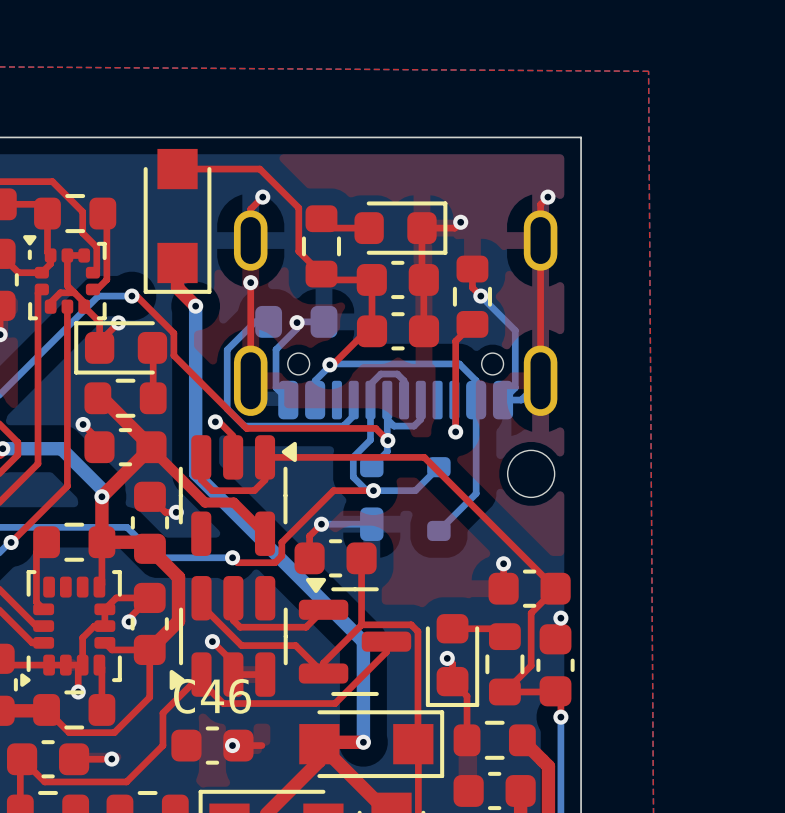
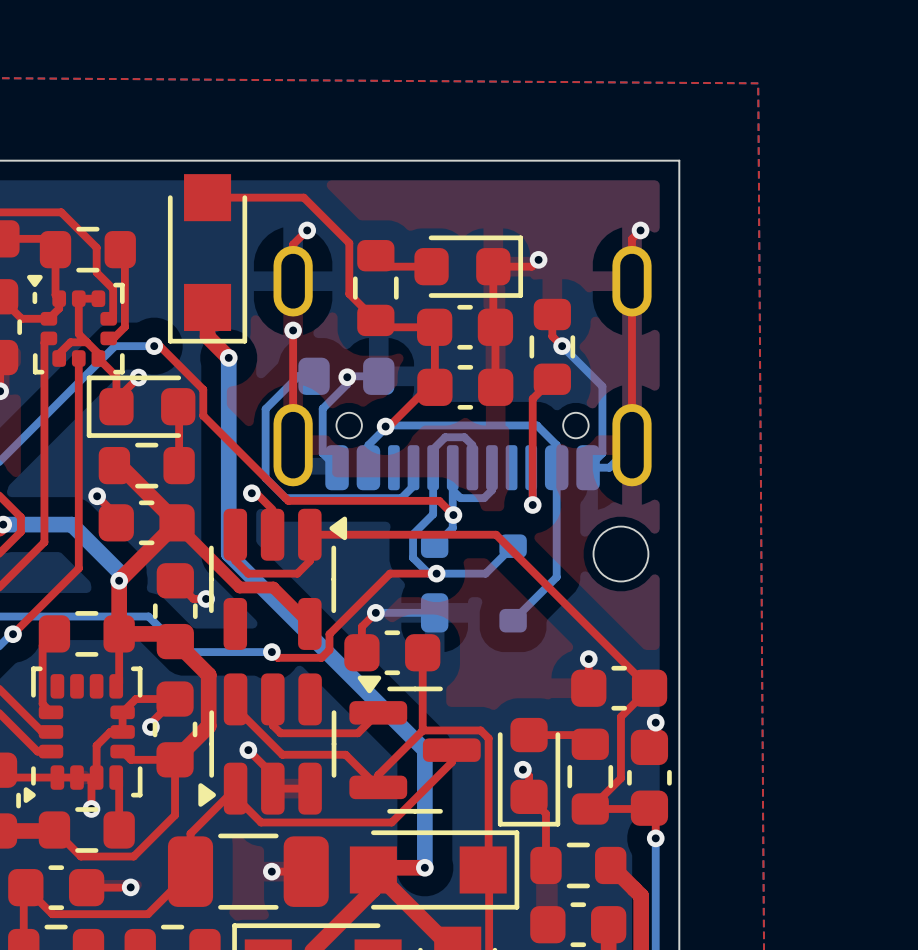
C46: (212, 745) -> none
part: none -> (248, 871)

